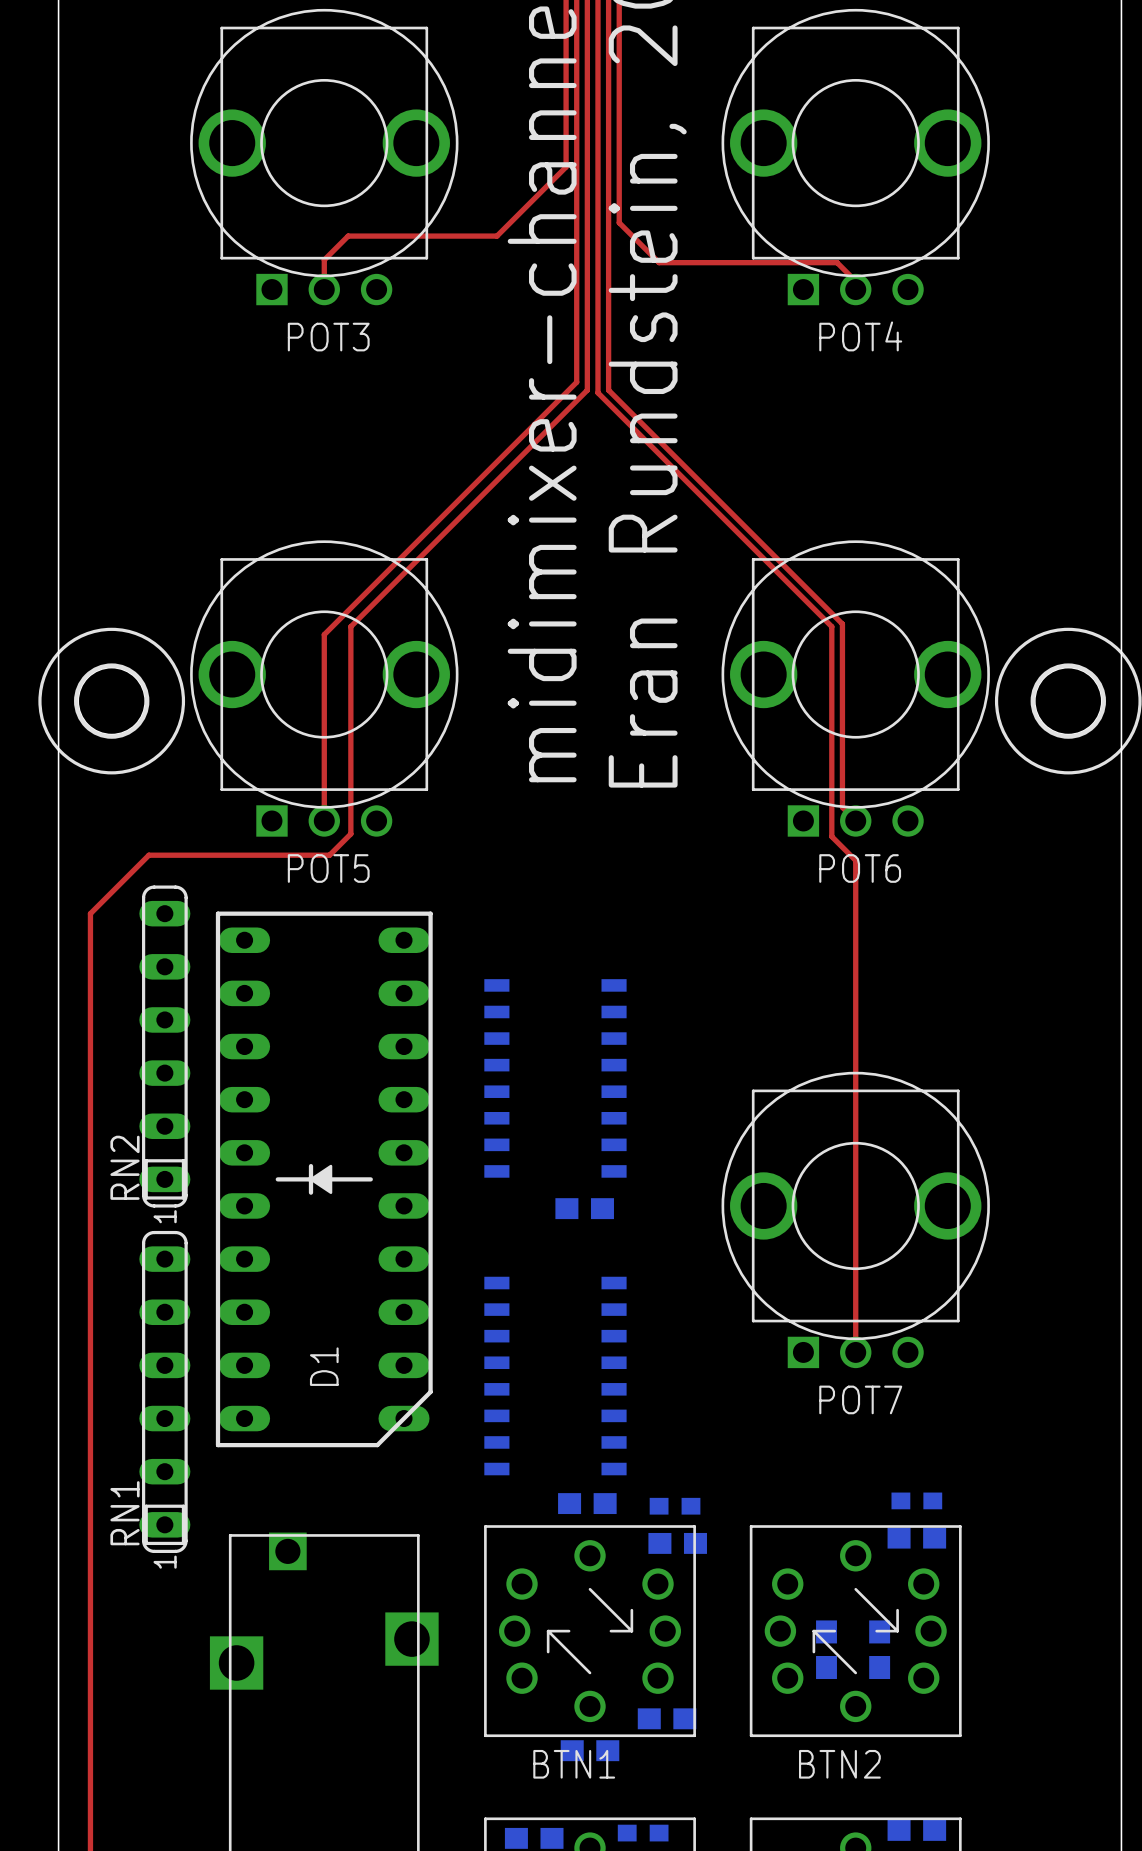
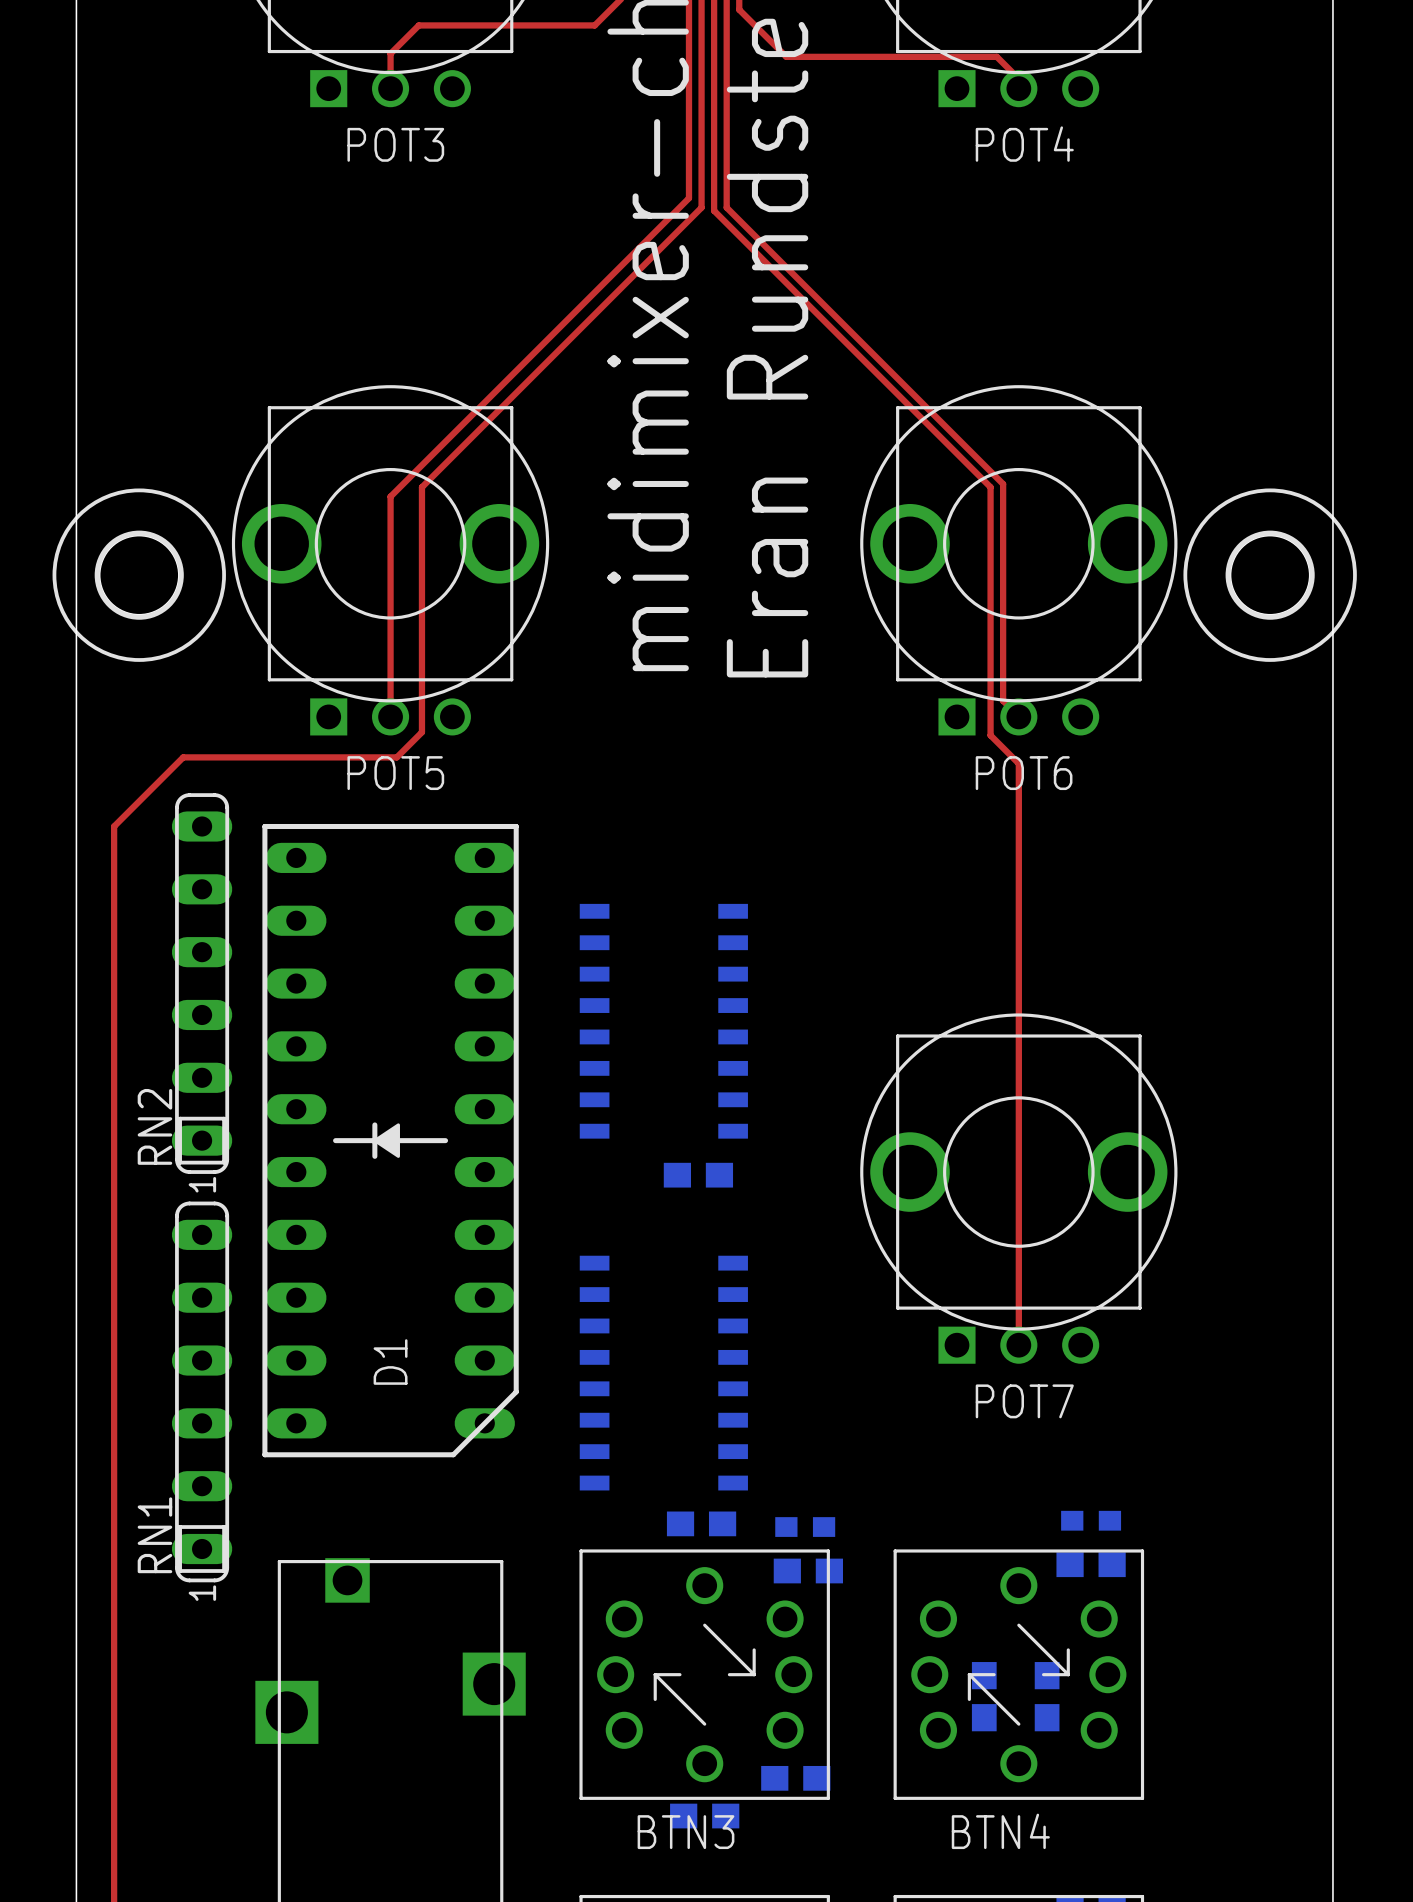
BTN1 name: BTN1 (574, 1764) -> BTN3 (686, 1832)
BTN2 name: BTN2 (839, 1764) -> BTN4 (1000, 1831)

